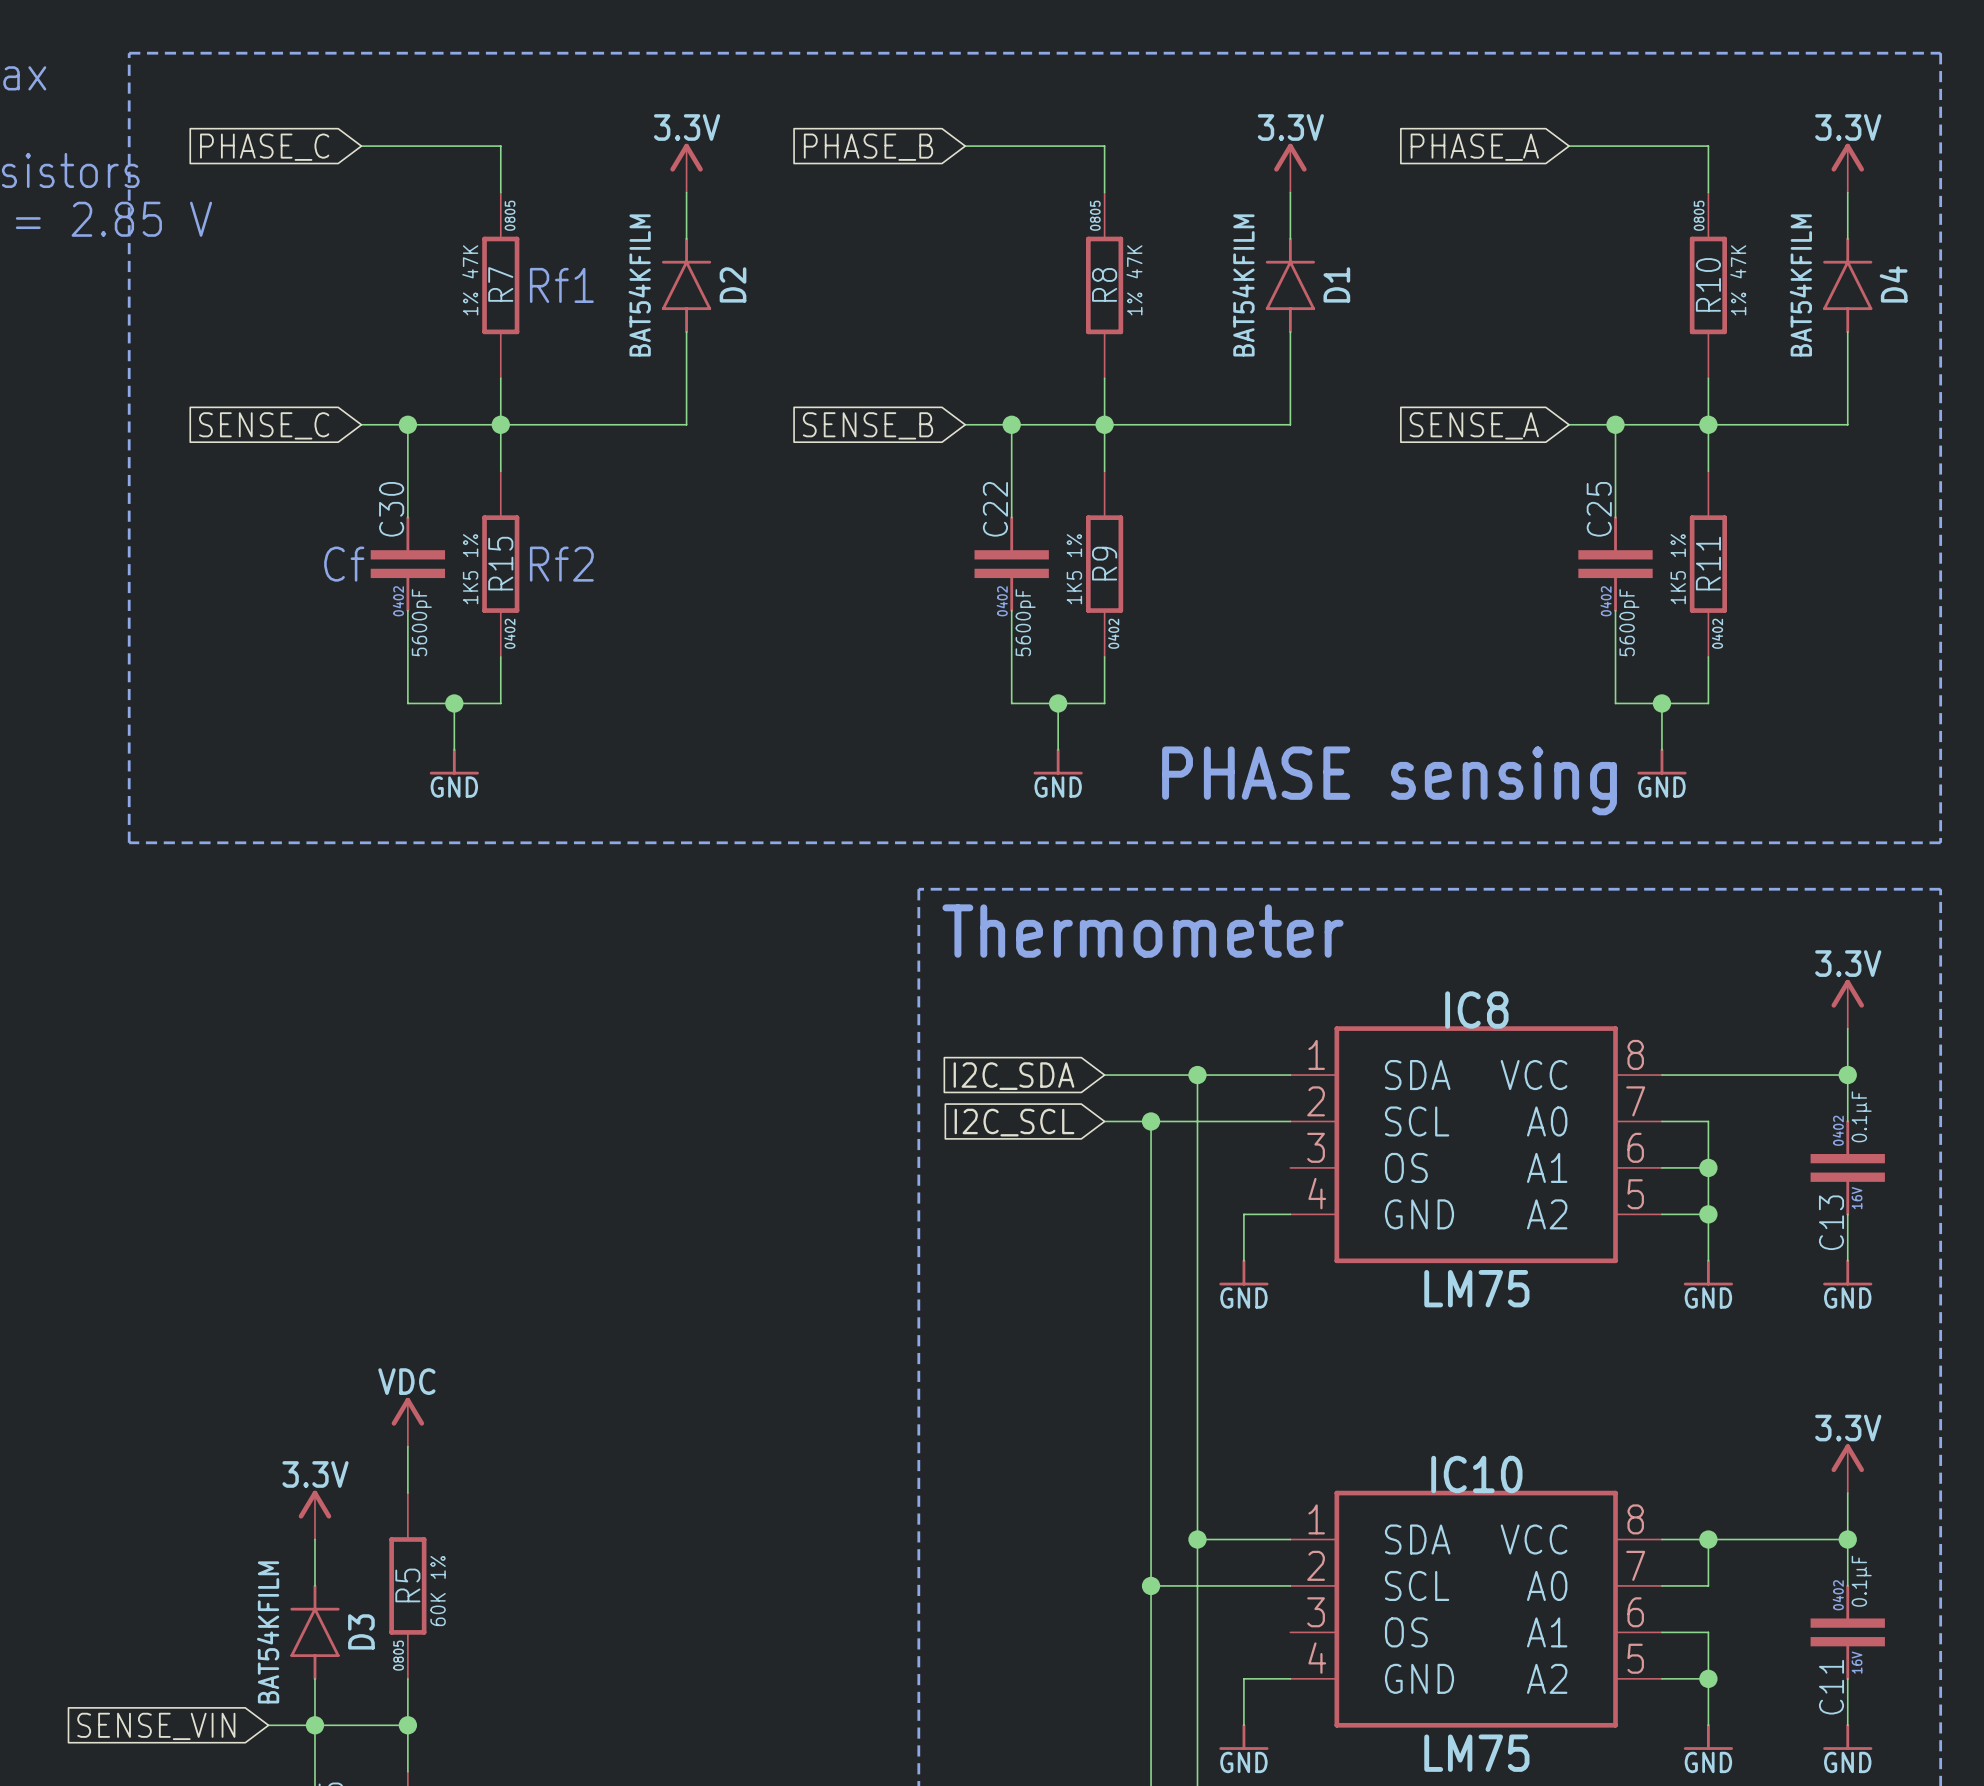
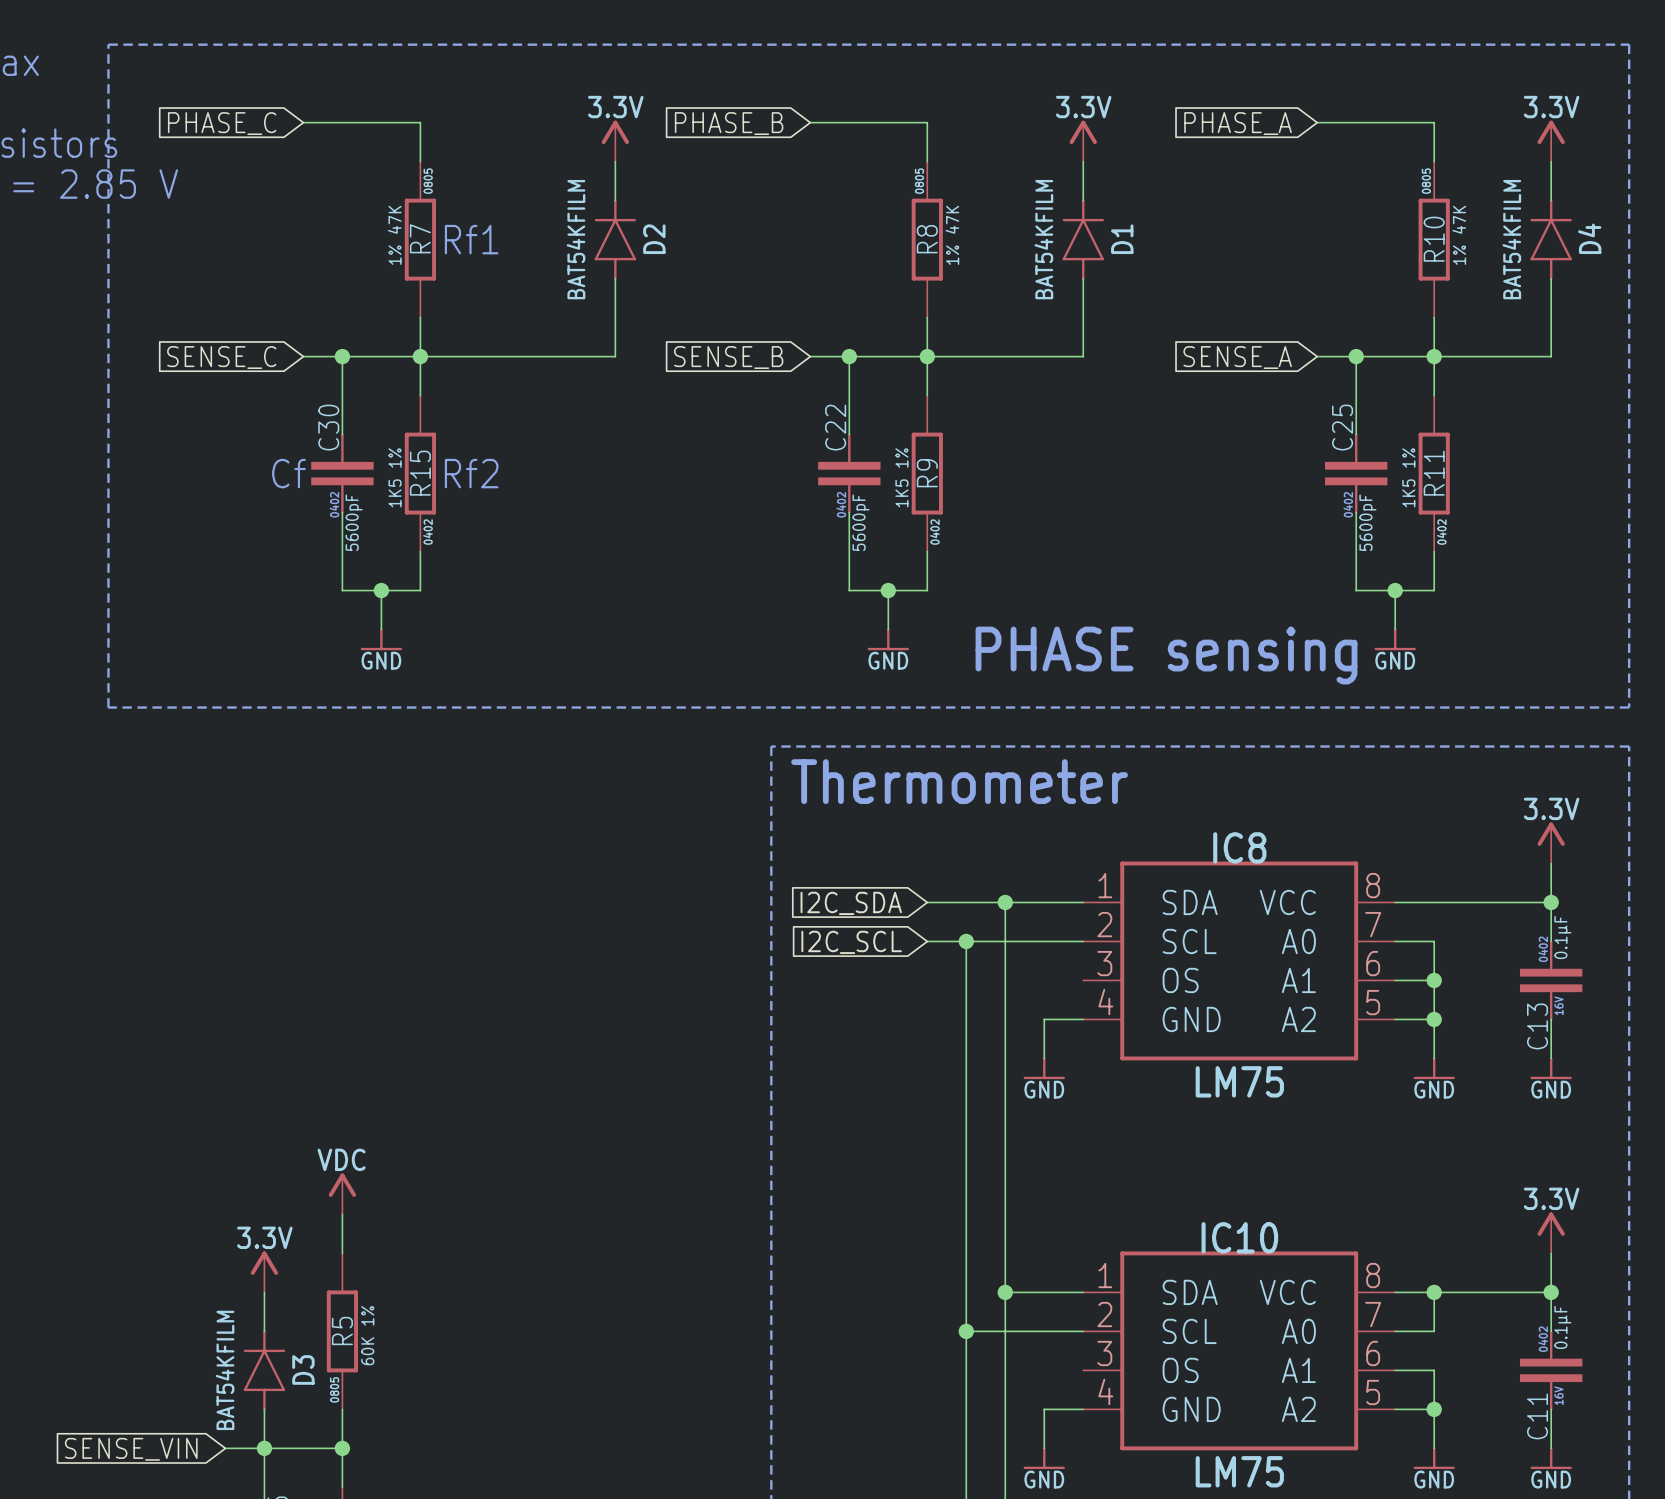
power symbol position: 3.3V (686, 168) -> 3.3V (615, 141)
wire: (686, 192) (686, 238) -> (615, 161) (615, 200)
D2 position: (686, 285) -> (615, 239)
wire: (686, 331) (686, 424) -> (615, 278) (615, 356) (576, 356)

